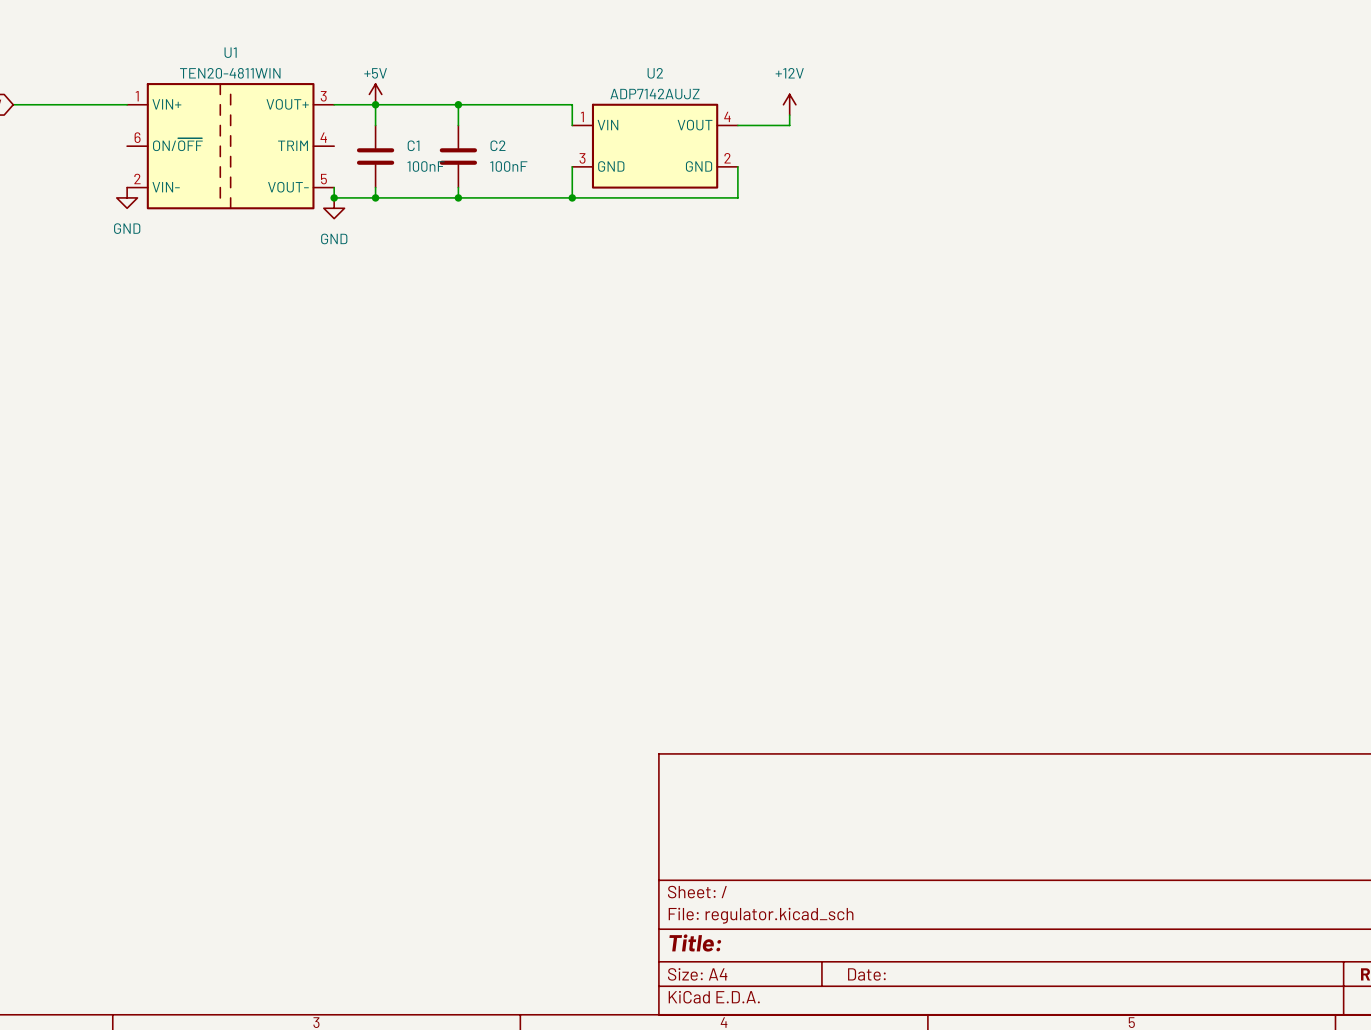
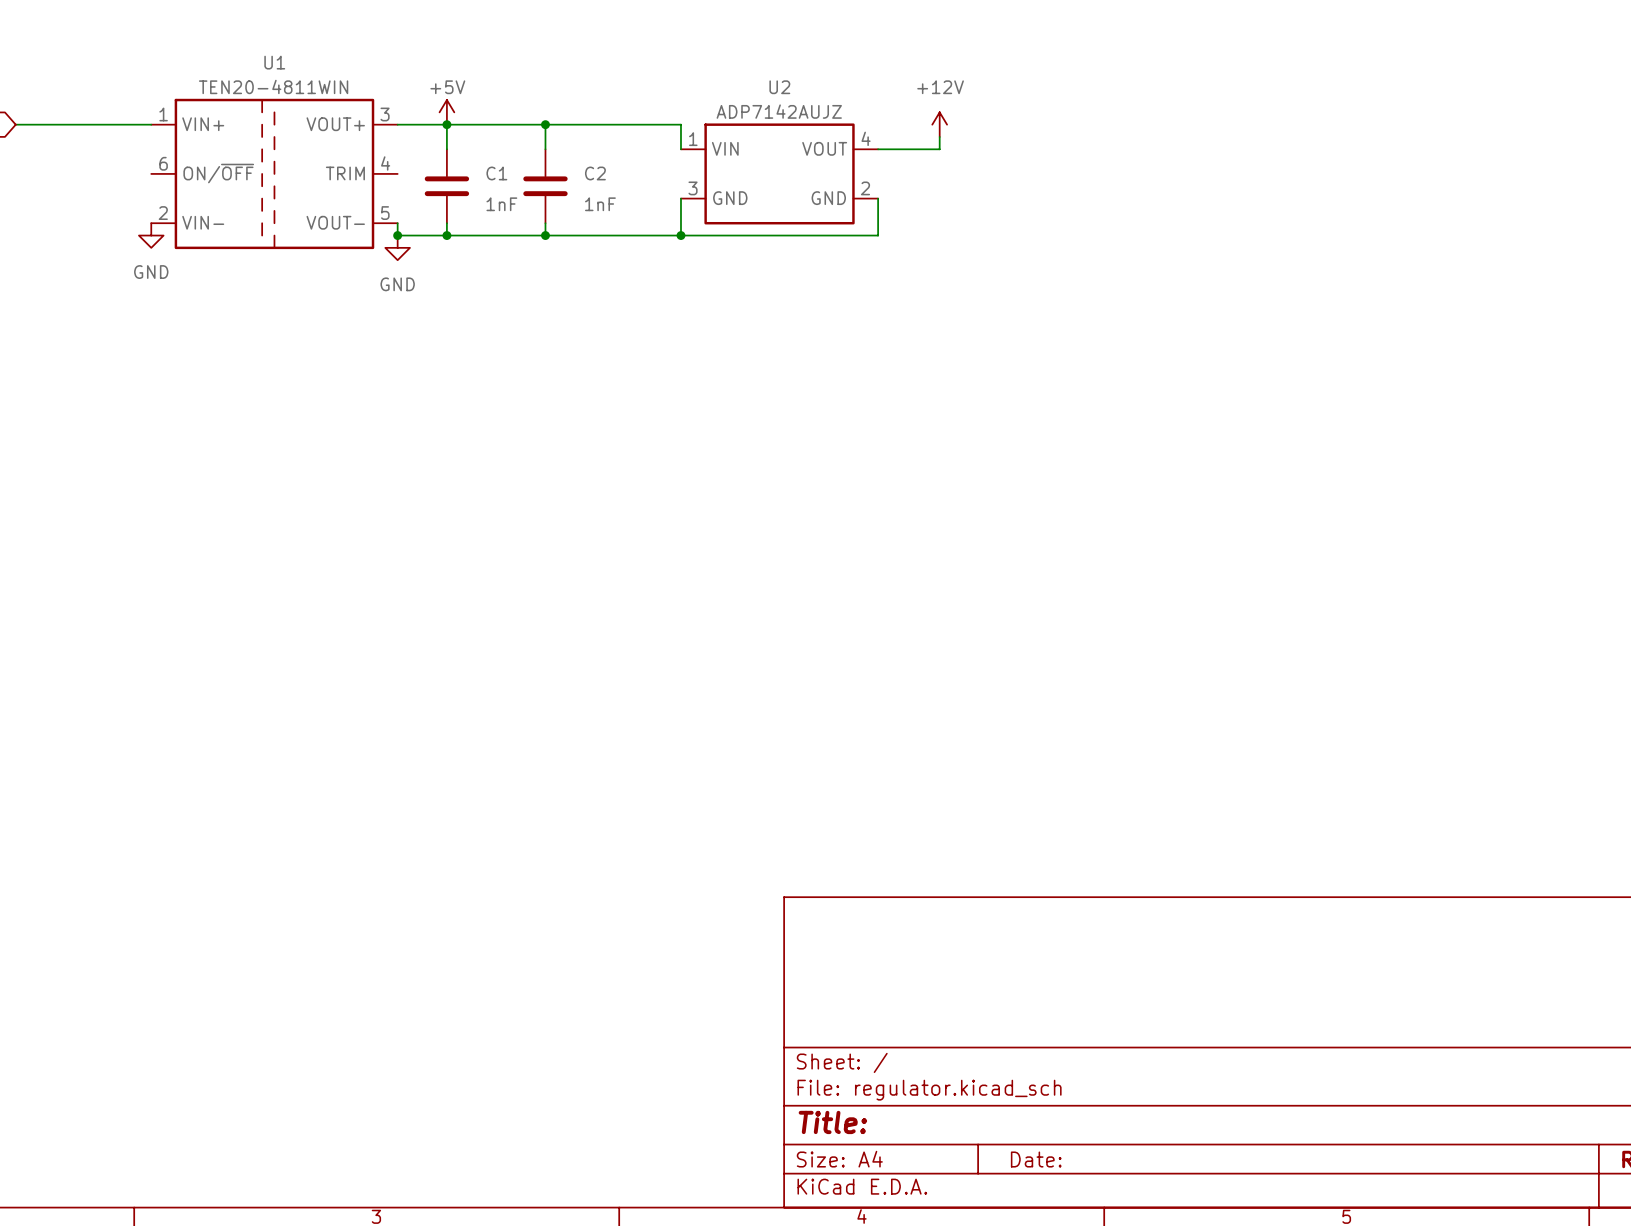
C1 value: 100nF (426, 166) -> 1nF (501, 204)
C2 value: 100nF (508, 166) -> 1nF (600, 204)

